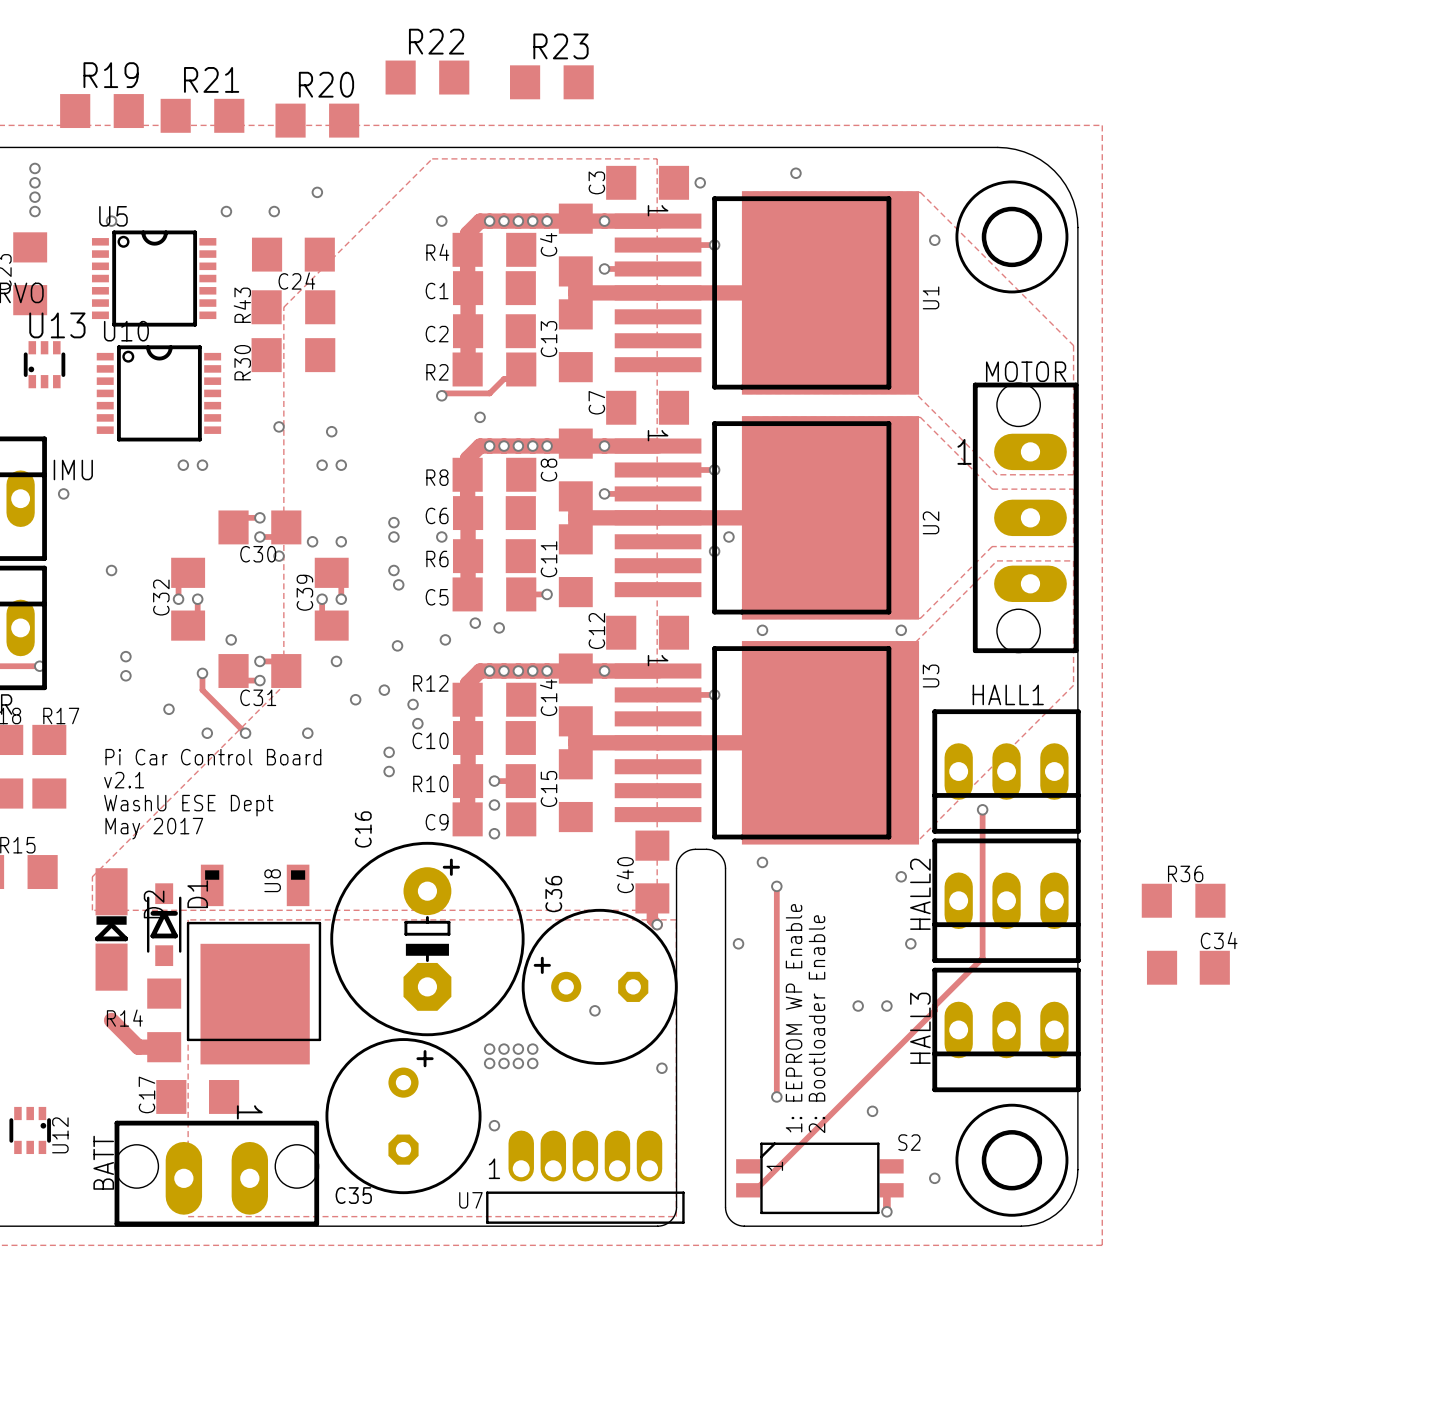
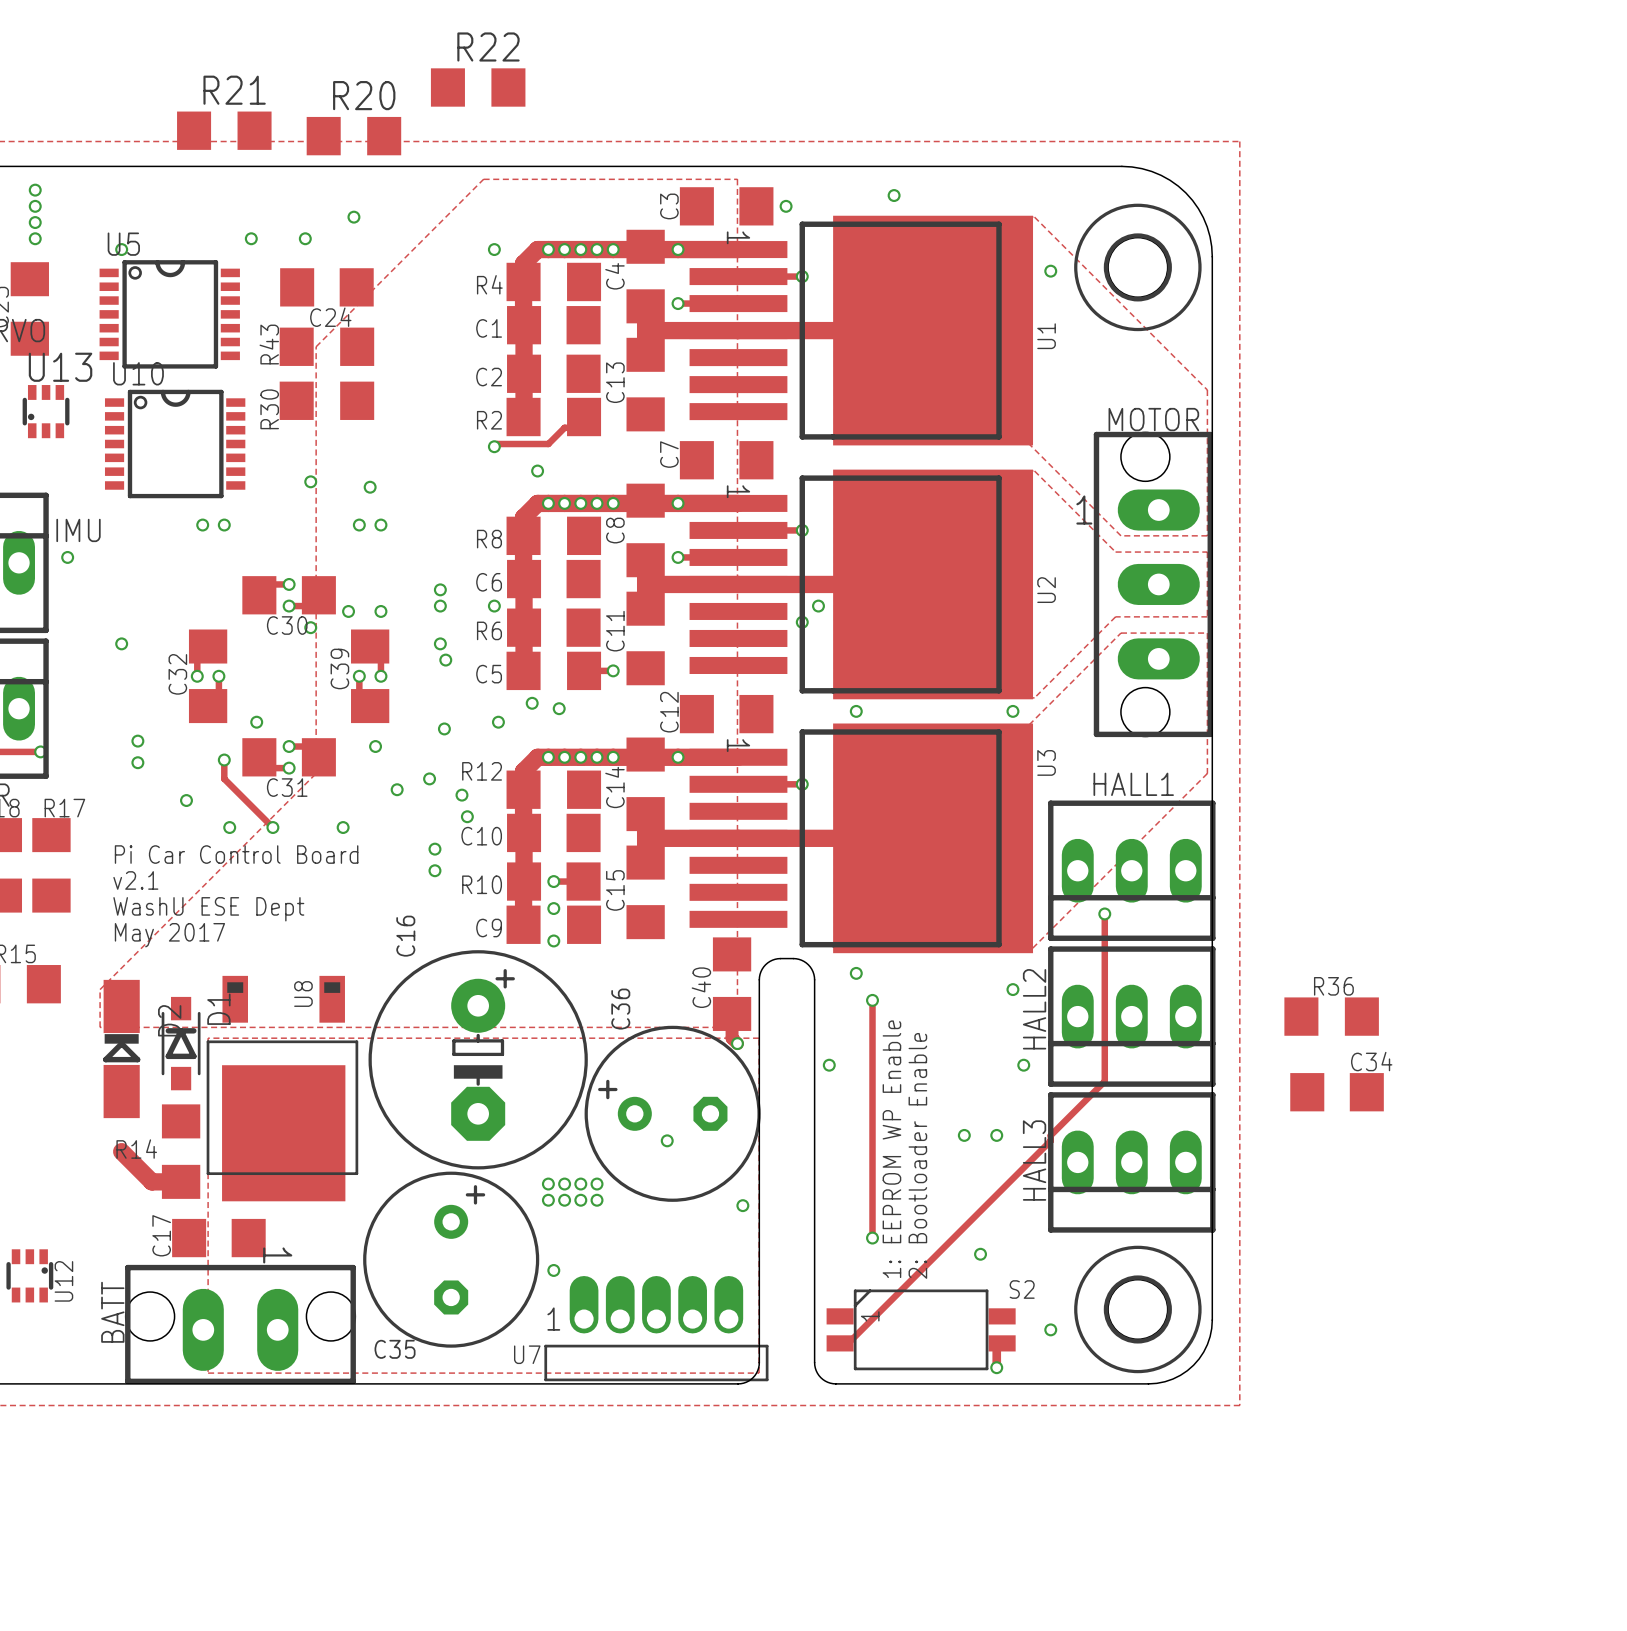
R23: (551, 82) -> none
R19: (101, 111) -> none

